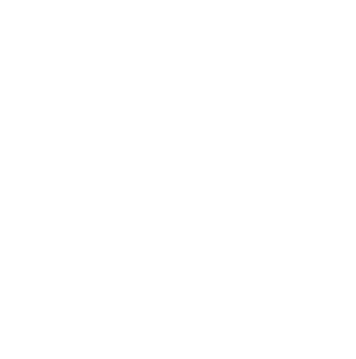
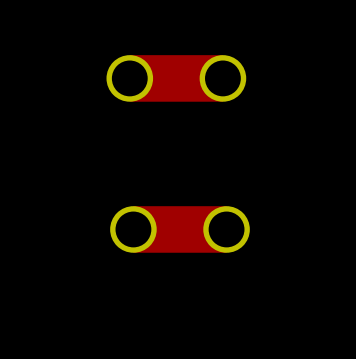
part: none -> (176, 78)
part: none -> (179, 229)

